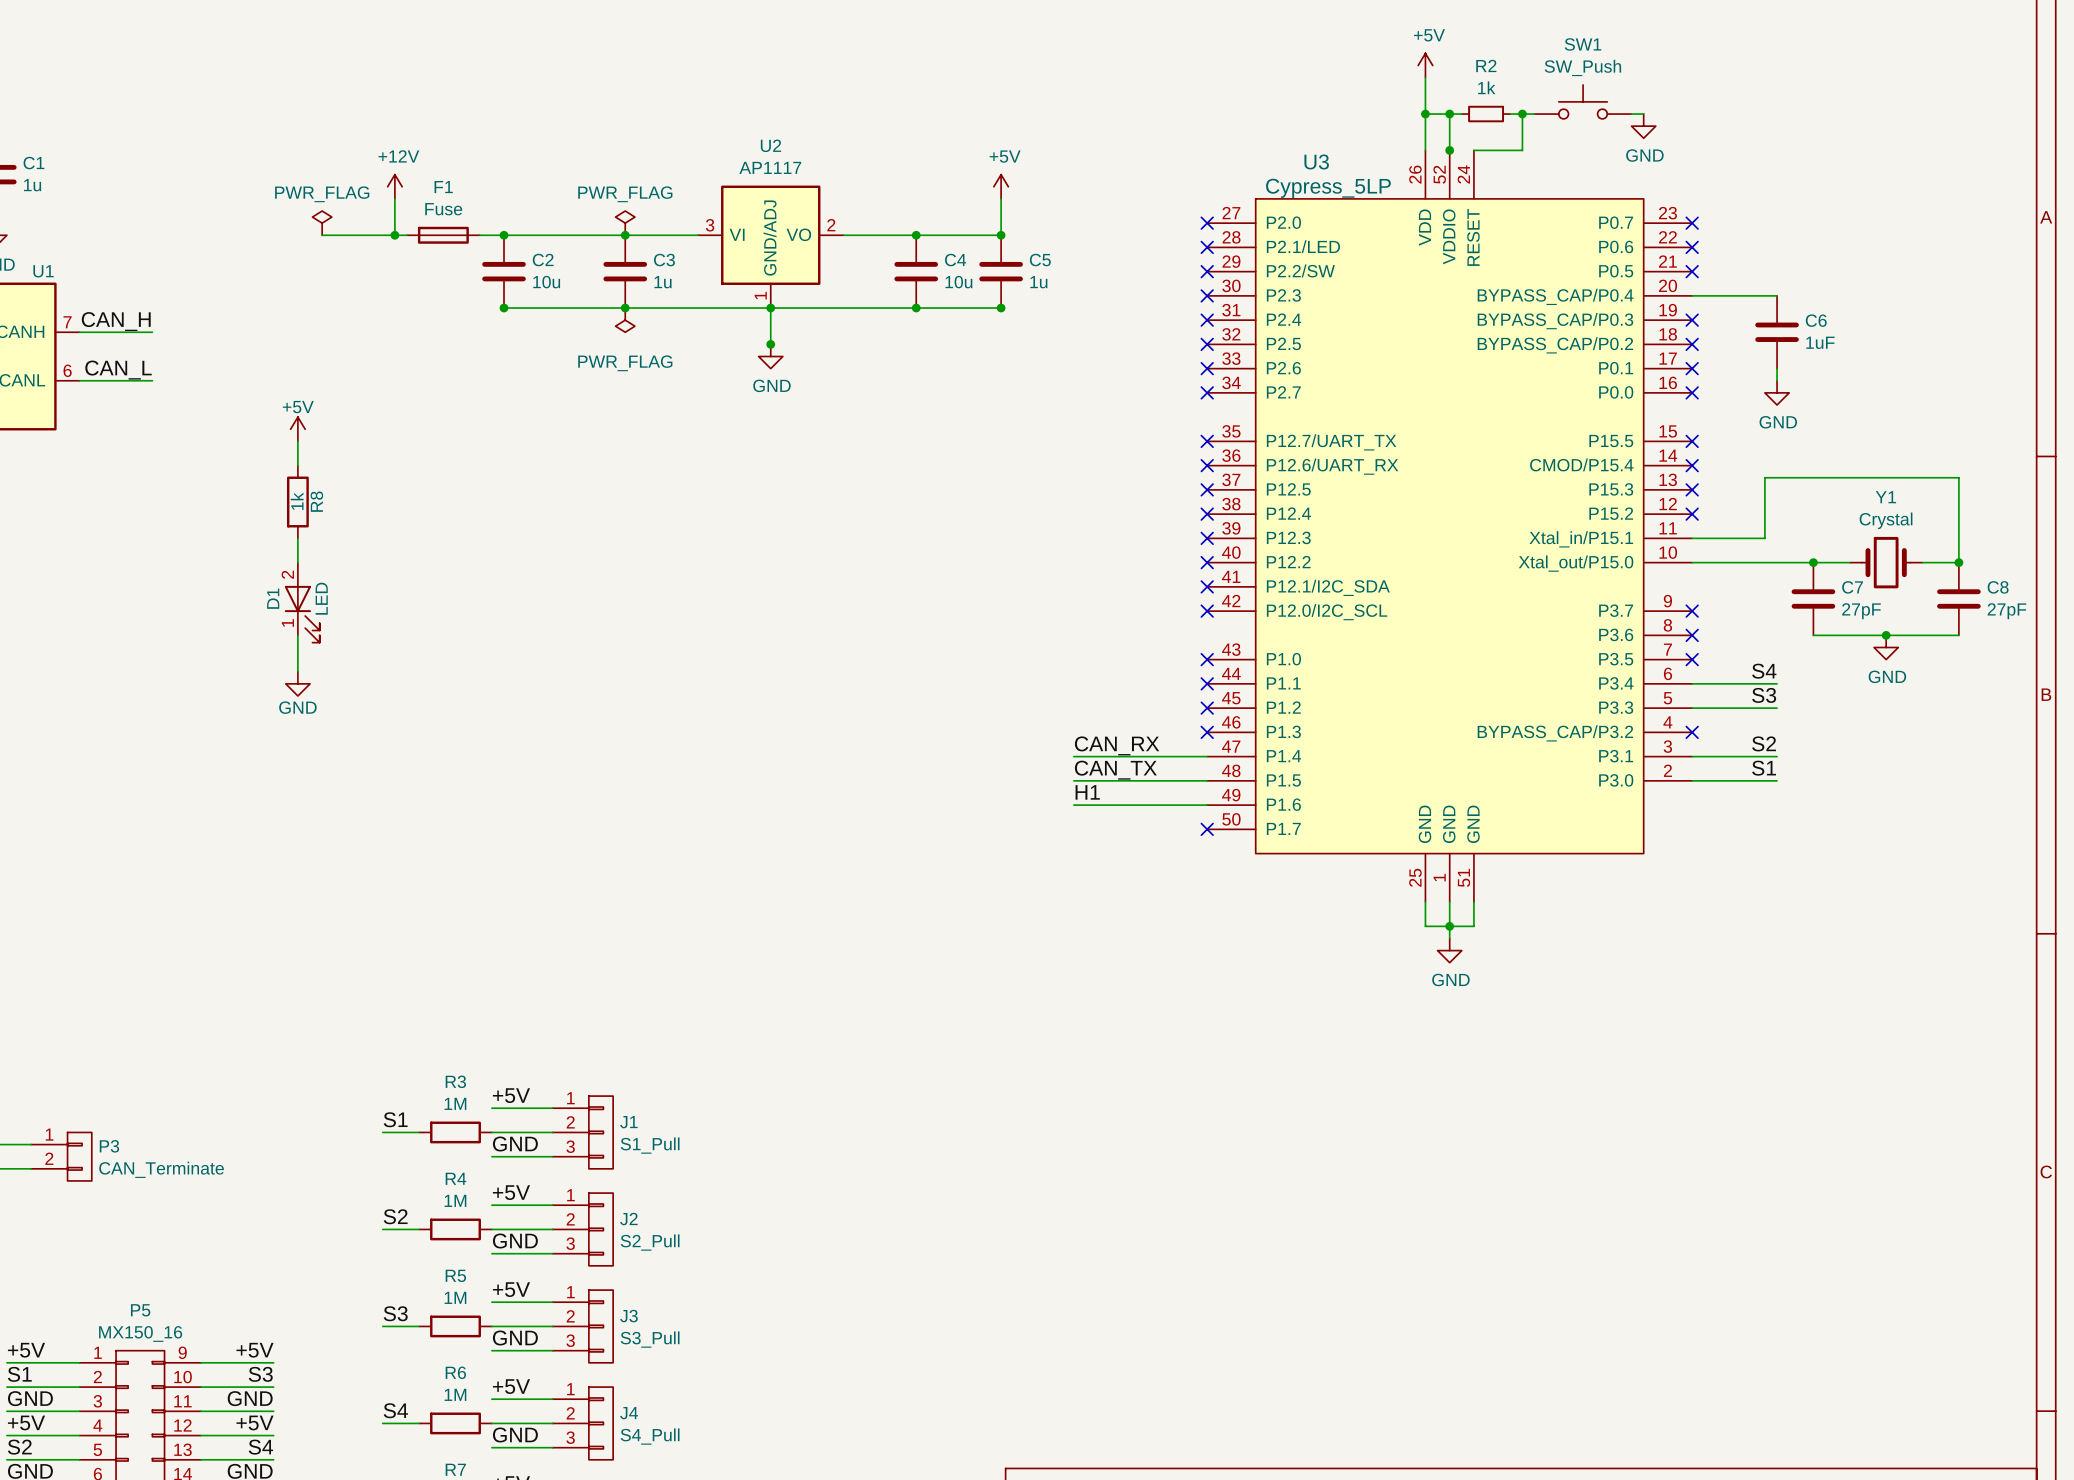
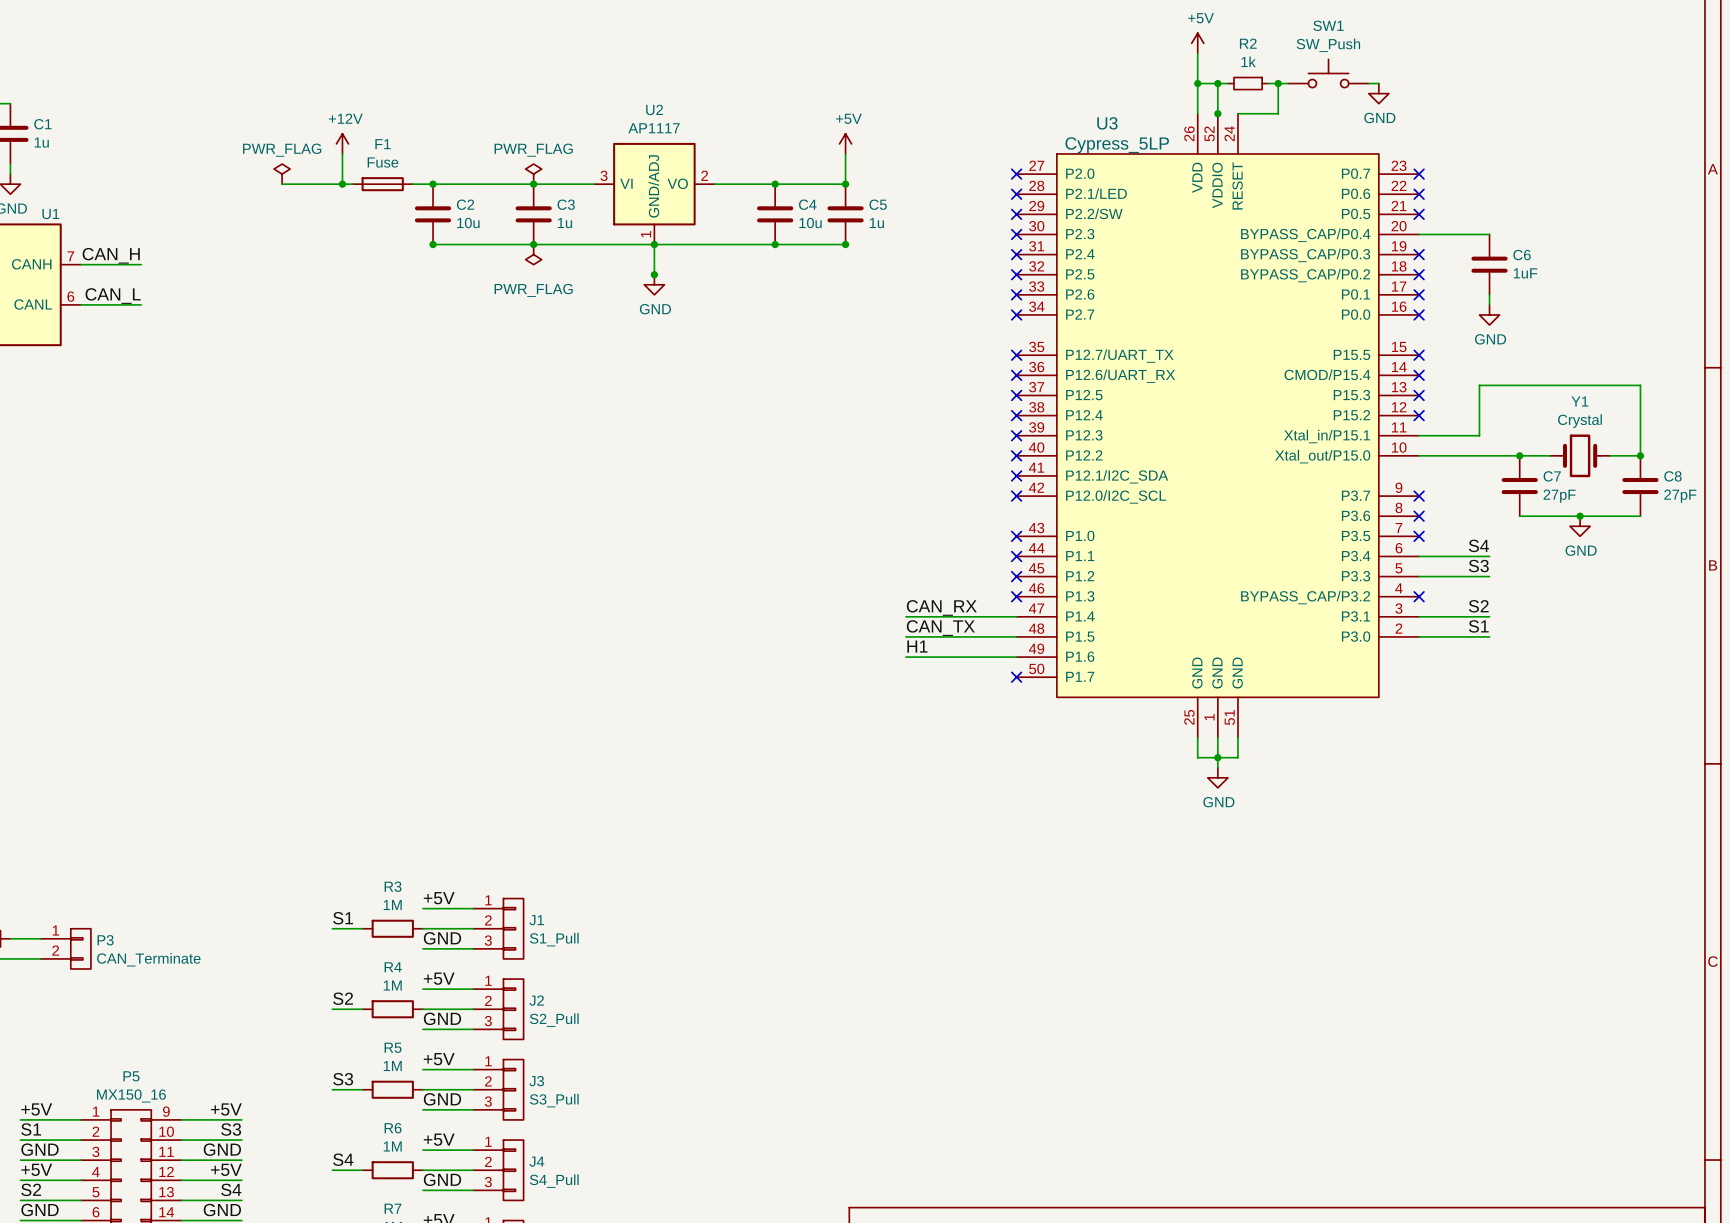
power symbol: +5V (297, 429) -> none
wire: (297, 441) (297, 465) -> none
R8: 1k (297, 502) -> none
wire: (297, 538) (297, 562) -> none
D1: LED (302, 602) -> none
wire: (297, 635) (297, 671) -> none
power symbol: GND (297, 683) -> none

